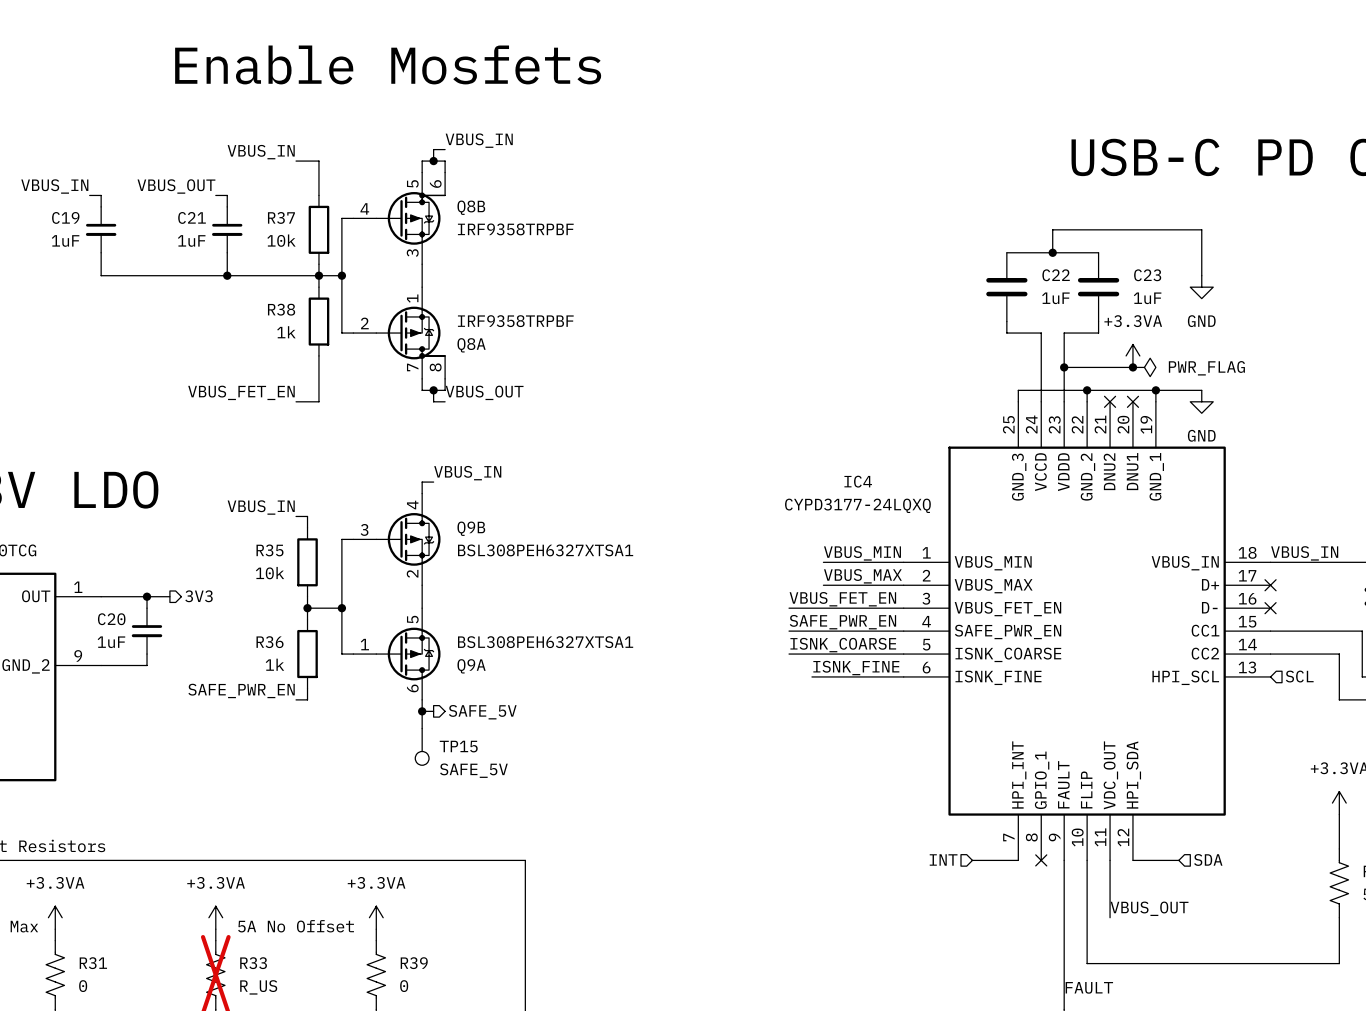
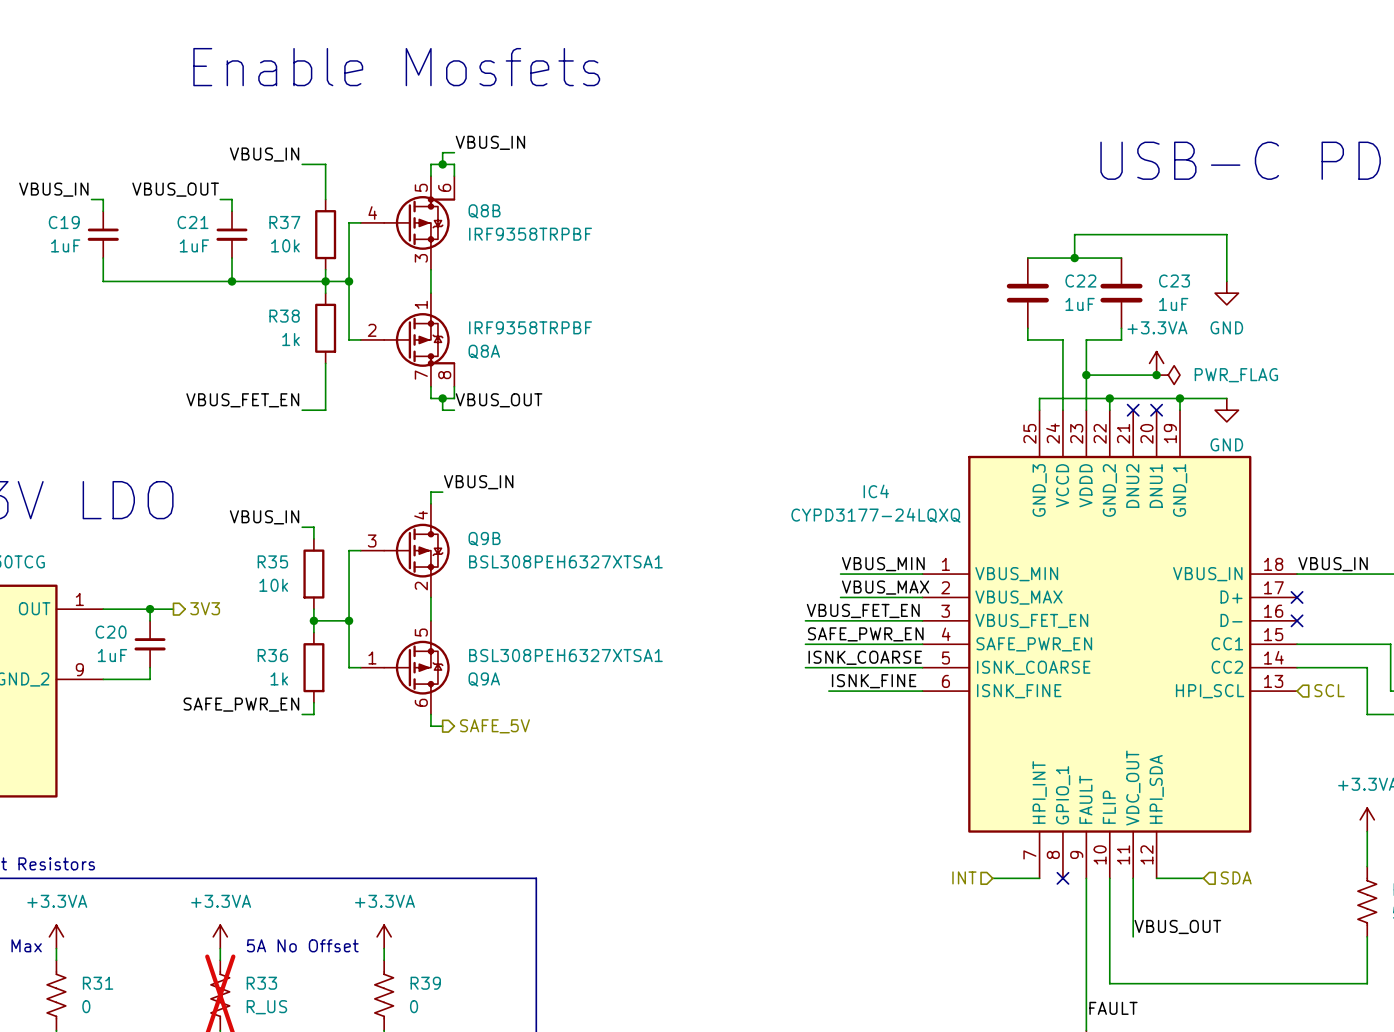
wire: (422, 711) (422, 728) -> none
junction: (422, 711) -> none
TP15: SAFE_5V (422, 746) -> none

